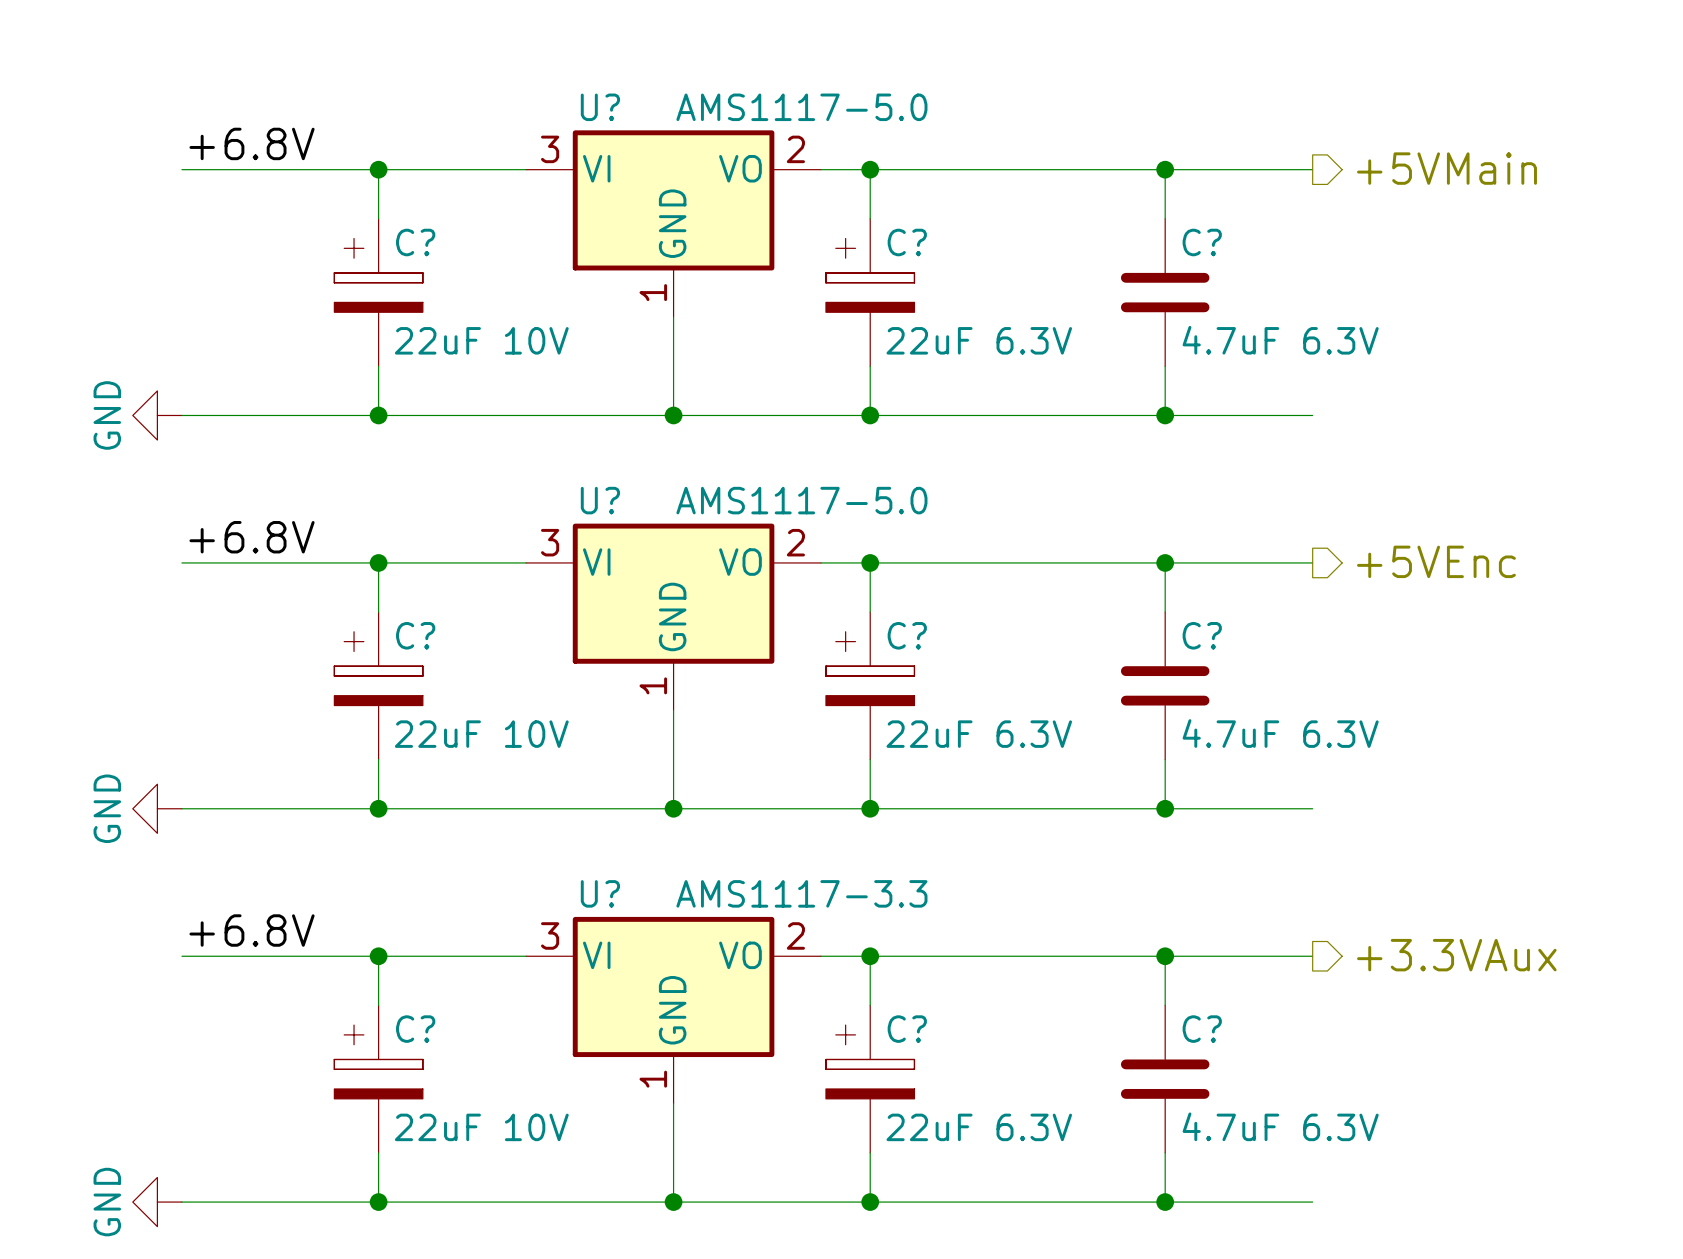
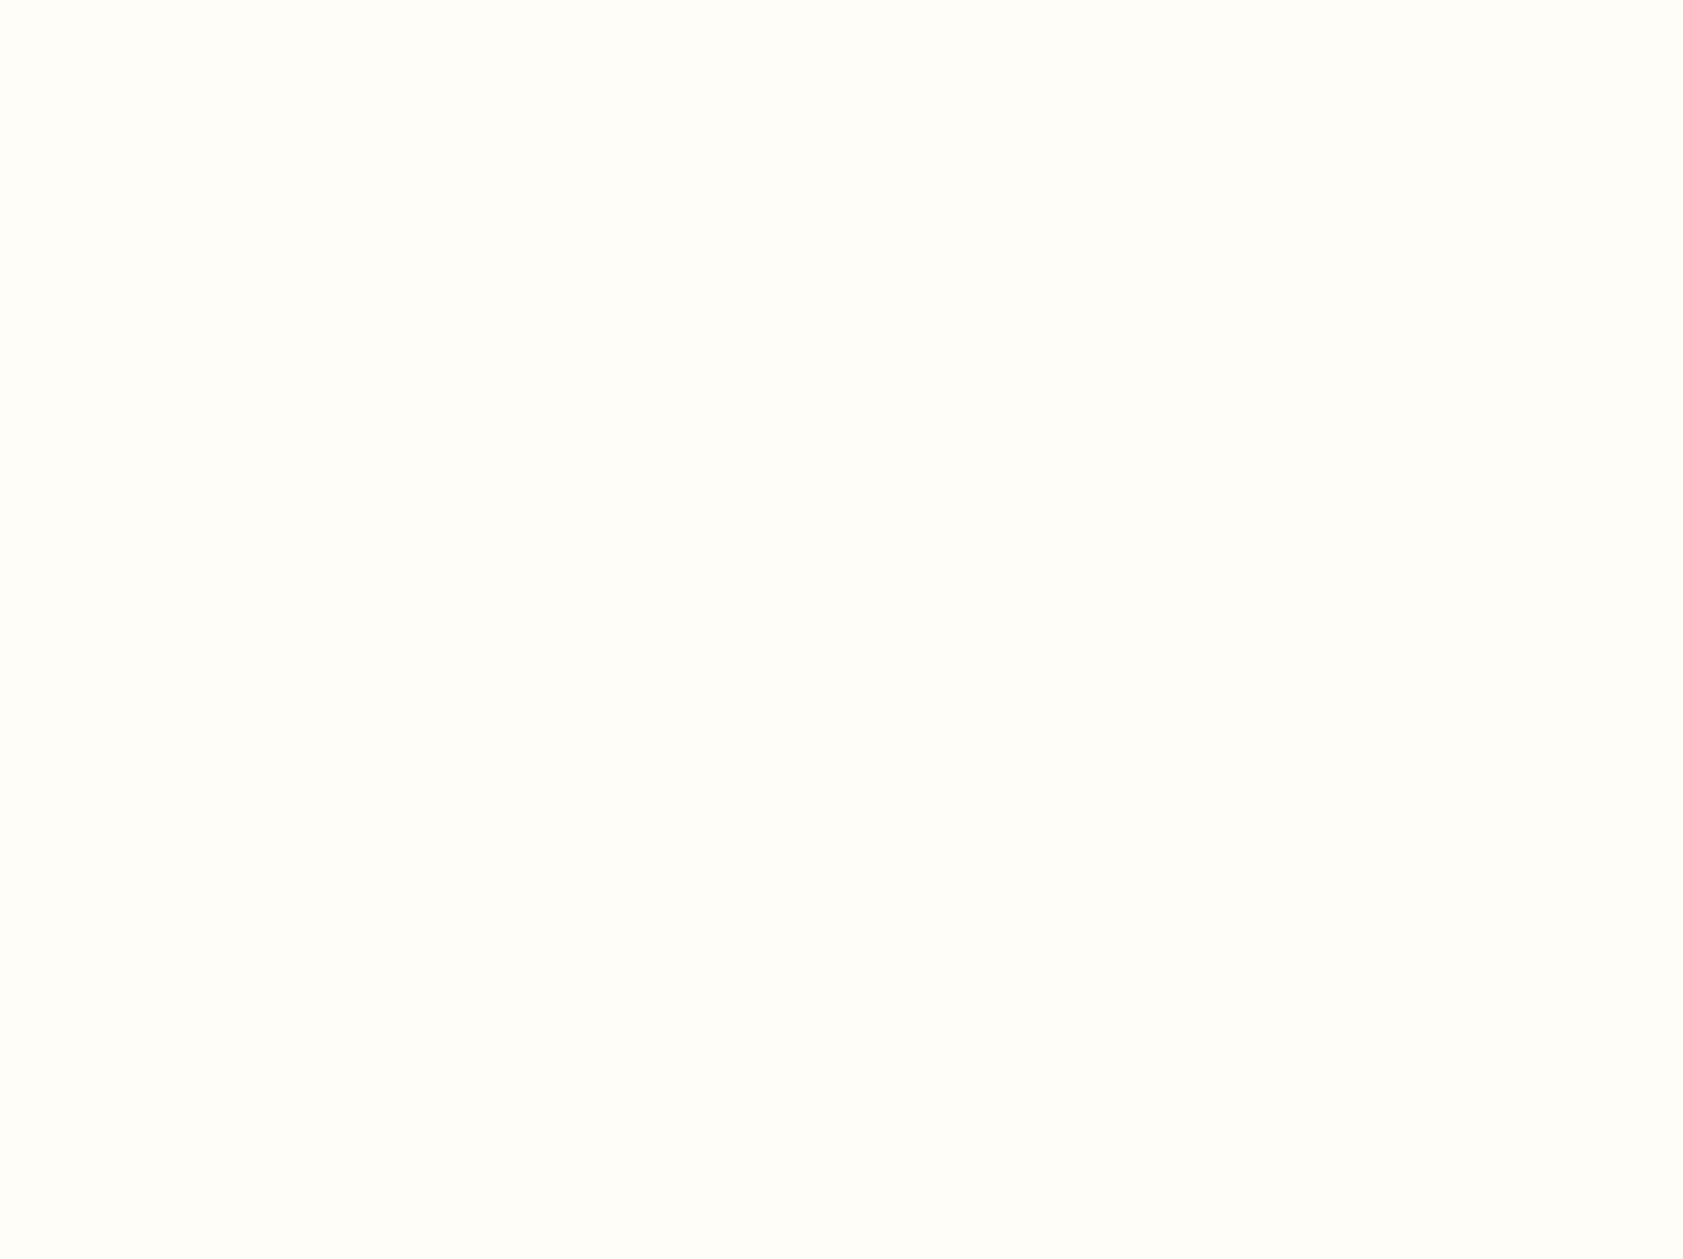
label: +6.8V (252, 143) -> none
hierarchical label: +5VMain (1446, 168) -> none
wire: (181, 169) (526, 169) -> none
wire: (378, 169) (378, 218) -> none
junction: (378, 169) -> none
wire: (821, 169) (1312, 169) -> none
wire: (870, 169) (870, 218) -> none
junction: (870, 169) -> none
wire: (1165, 169) (1165, 218) -> none
junction: (1165, 169) -> none
U?: AMS1117-5.0 (673, 223) -> none
C?: 22uF 10V (378, 292) -> none
C?: 22uF 6.3V (870, 292) -> none
C?: 4.7uF 6.3V (1165, 292) -> none
wire: (673, 317) (673, 415) -> none
wire: (378, 366) (378, 415) -> none
wire: (870, 366) (870, 415) -> none
wire: (1165, 366) (1165, 415) -> none
power symbol: GND (157, 415) -> none
wire: (181, 415) (1312, 415) -> none
junction: (378, 415) -> none
junction: (673, 415) -> none
junction: (870, 415) -> none
junction: (1165, 415) -> none
label: +6.8V (252, 537) -> none
hierarchical label: +5VEnc (1436, 561) -> none
wire: (181, 562) (526, 562) -> none
wire: (378, 562) (378, 612) -> none
junction: (378, 562) -> none
wire: (821, 562) (1312, 562) -> none
wire: (870, 562) (870, 612) -> none
junction: (870, 562) -> none
wire: (1165, 562) (1165, 612) -> none
junction: (1165, 562) -> none
U?: AMS1117-5.0 (673, 617) -> none
C?: 22uF 10V (378, 685) -> none
C?: 22uF 6.3V (870, 685) -> none
C?: 4.7uF 6.3V (1165, 685) -> none
wire: (673, 710) (673, 808) -> none
wire: (378, 759) (378, 808) -> none
wire: (870, 759) (870, 808) -> none
wire: (1165, 759) (1165, 808) -> none
power symbol: GND (157, 808) -> none
wire: (181, 808) (1312, 808) -> none
junction: (378, 808) -> none
junction: (673, 808) -> none
junction: (870, 808) -> none
junction: (1165, 808) -> none
label: +6.8V (252, 930) -> none
hierarchical label: +3.3VAux (1456, 955) -> none
wire: (181, 956) (526, 956) -> none
wire: (378, 956) (378, 1005) -> none
junction: (378, 956) -> none
wire: (821, 956) (1312, 956) -> none
wire: (870, 956) (870, 1005) -> none
junction: (870, 956) -> none
wire: (1165, 956) (1165, 1005) -> none
junction: (1165, 956) -> none
U?: AMS1117-3.3 (673, 1010) -> none
C?: 22uF 10V (378, 1079) -> none
C?: 22uF 6.3V (870, 1079) -> none
C?: 4.7uF 6.3V (1165, 1079) -> none
wire: (673, 1103) (673, 1202) -> none
wire: (378, 1152) (378, 1202) -> none
wire: (870, 1152) (870, 1202) -> none
wire: (1165, 1152) (1165, 1202) -> none
power symbol: GND (157, 1202) -> none
wire: (181, 1202) (1312, 1202) -> none
junction: (378, 1202) -> none
junction: (673, 1202) -> none
junction: (870, 1202) -> none
junction: (1165, 1202) -> none

